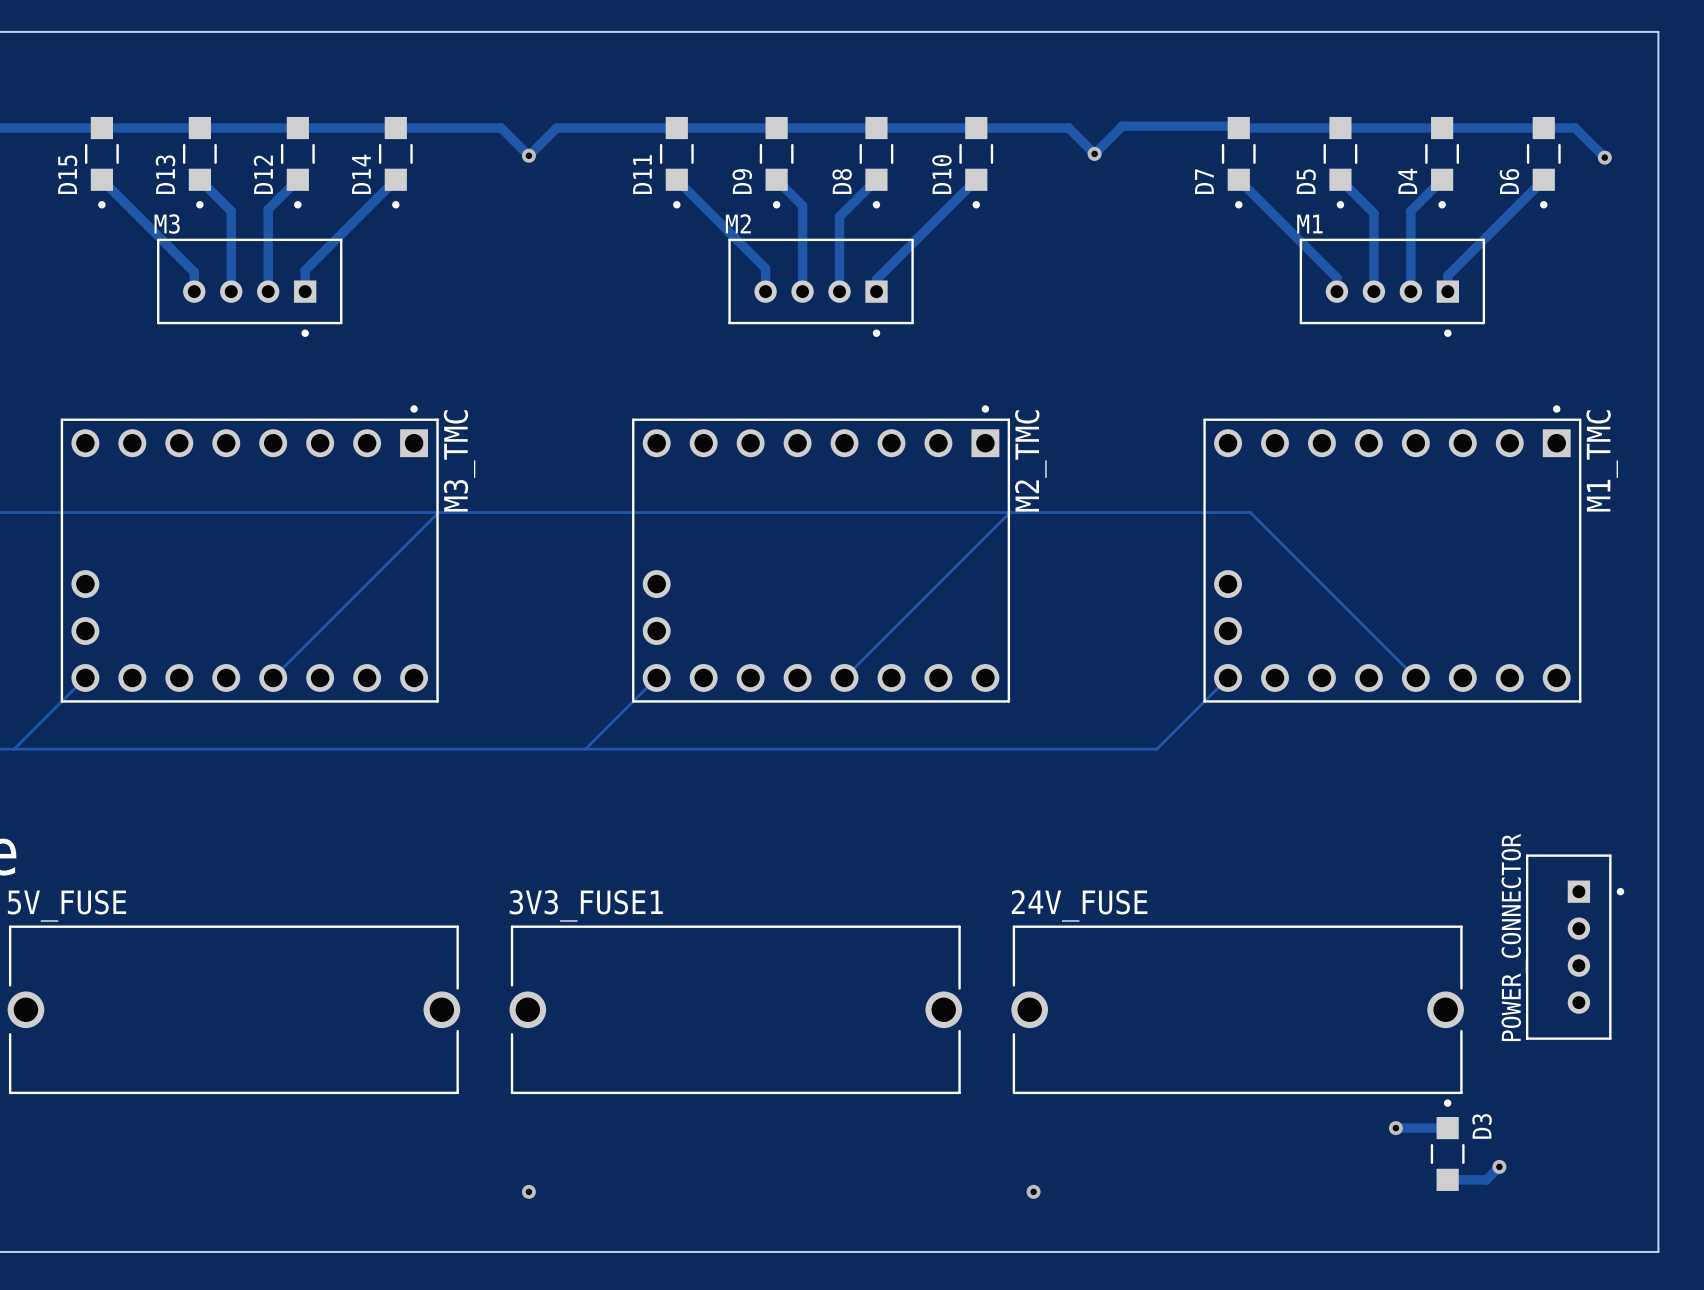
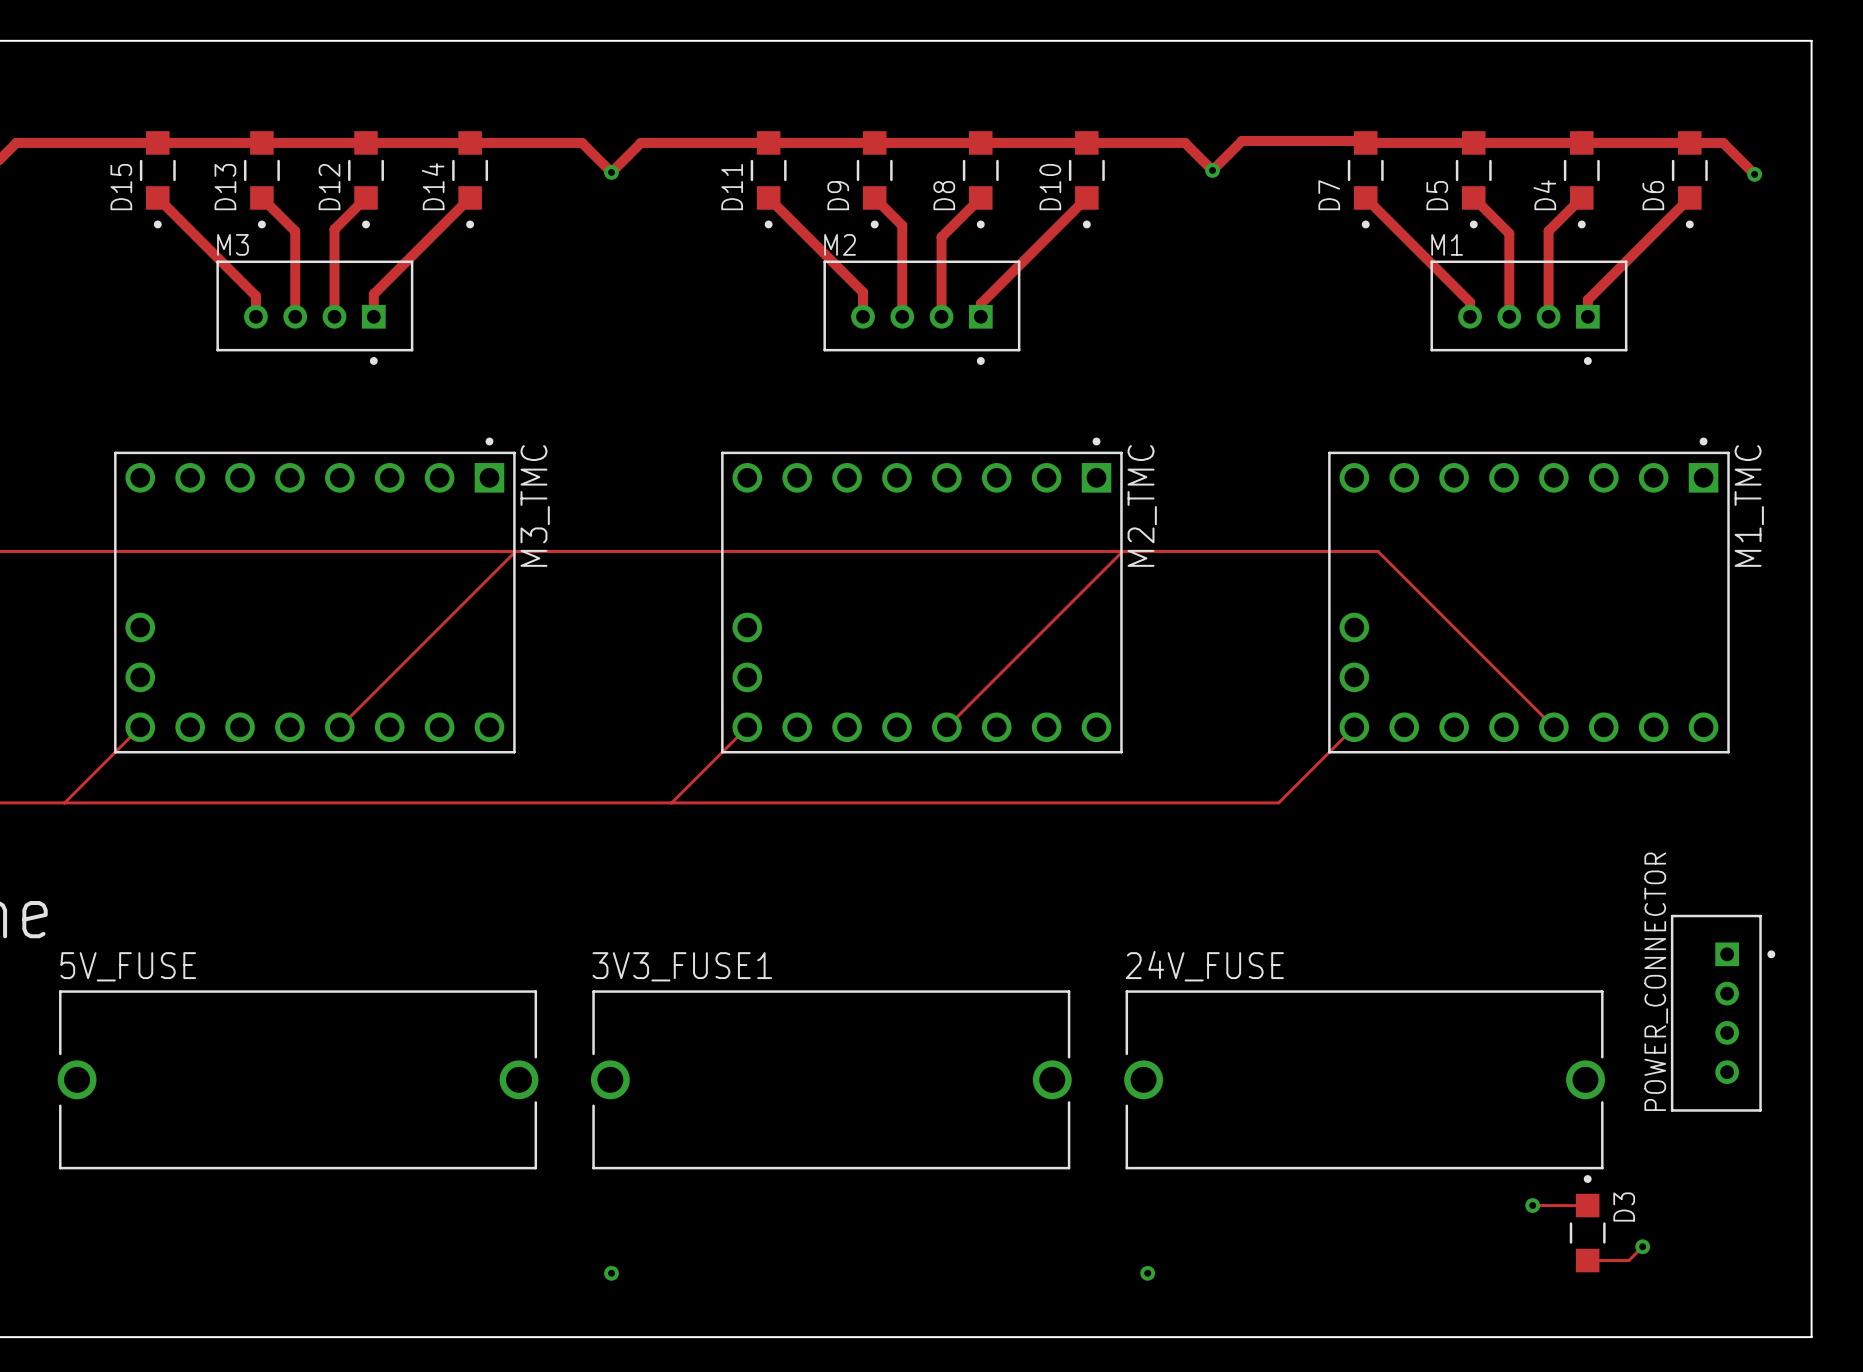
track width: thick (1395, 1128) (1447, 1128) -> thin (1532, 1205) (1587, 1205)
track width: thick (1499, 1166) (1486, 1179) (1447, 1179) -> thin (1642, 1246) (1628, 1260) (1587, 1260)

